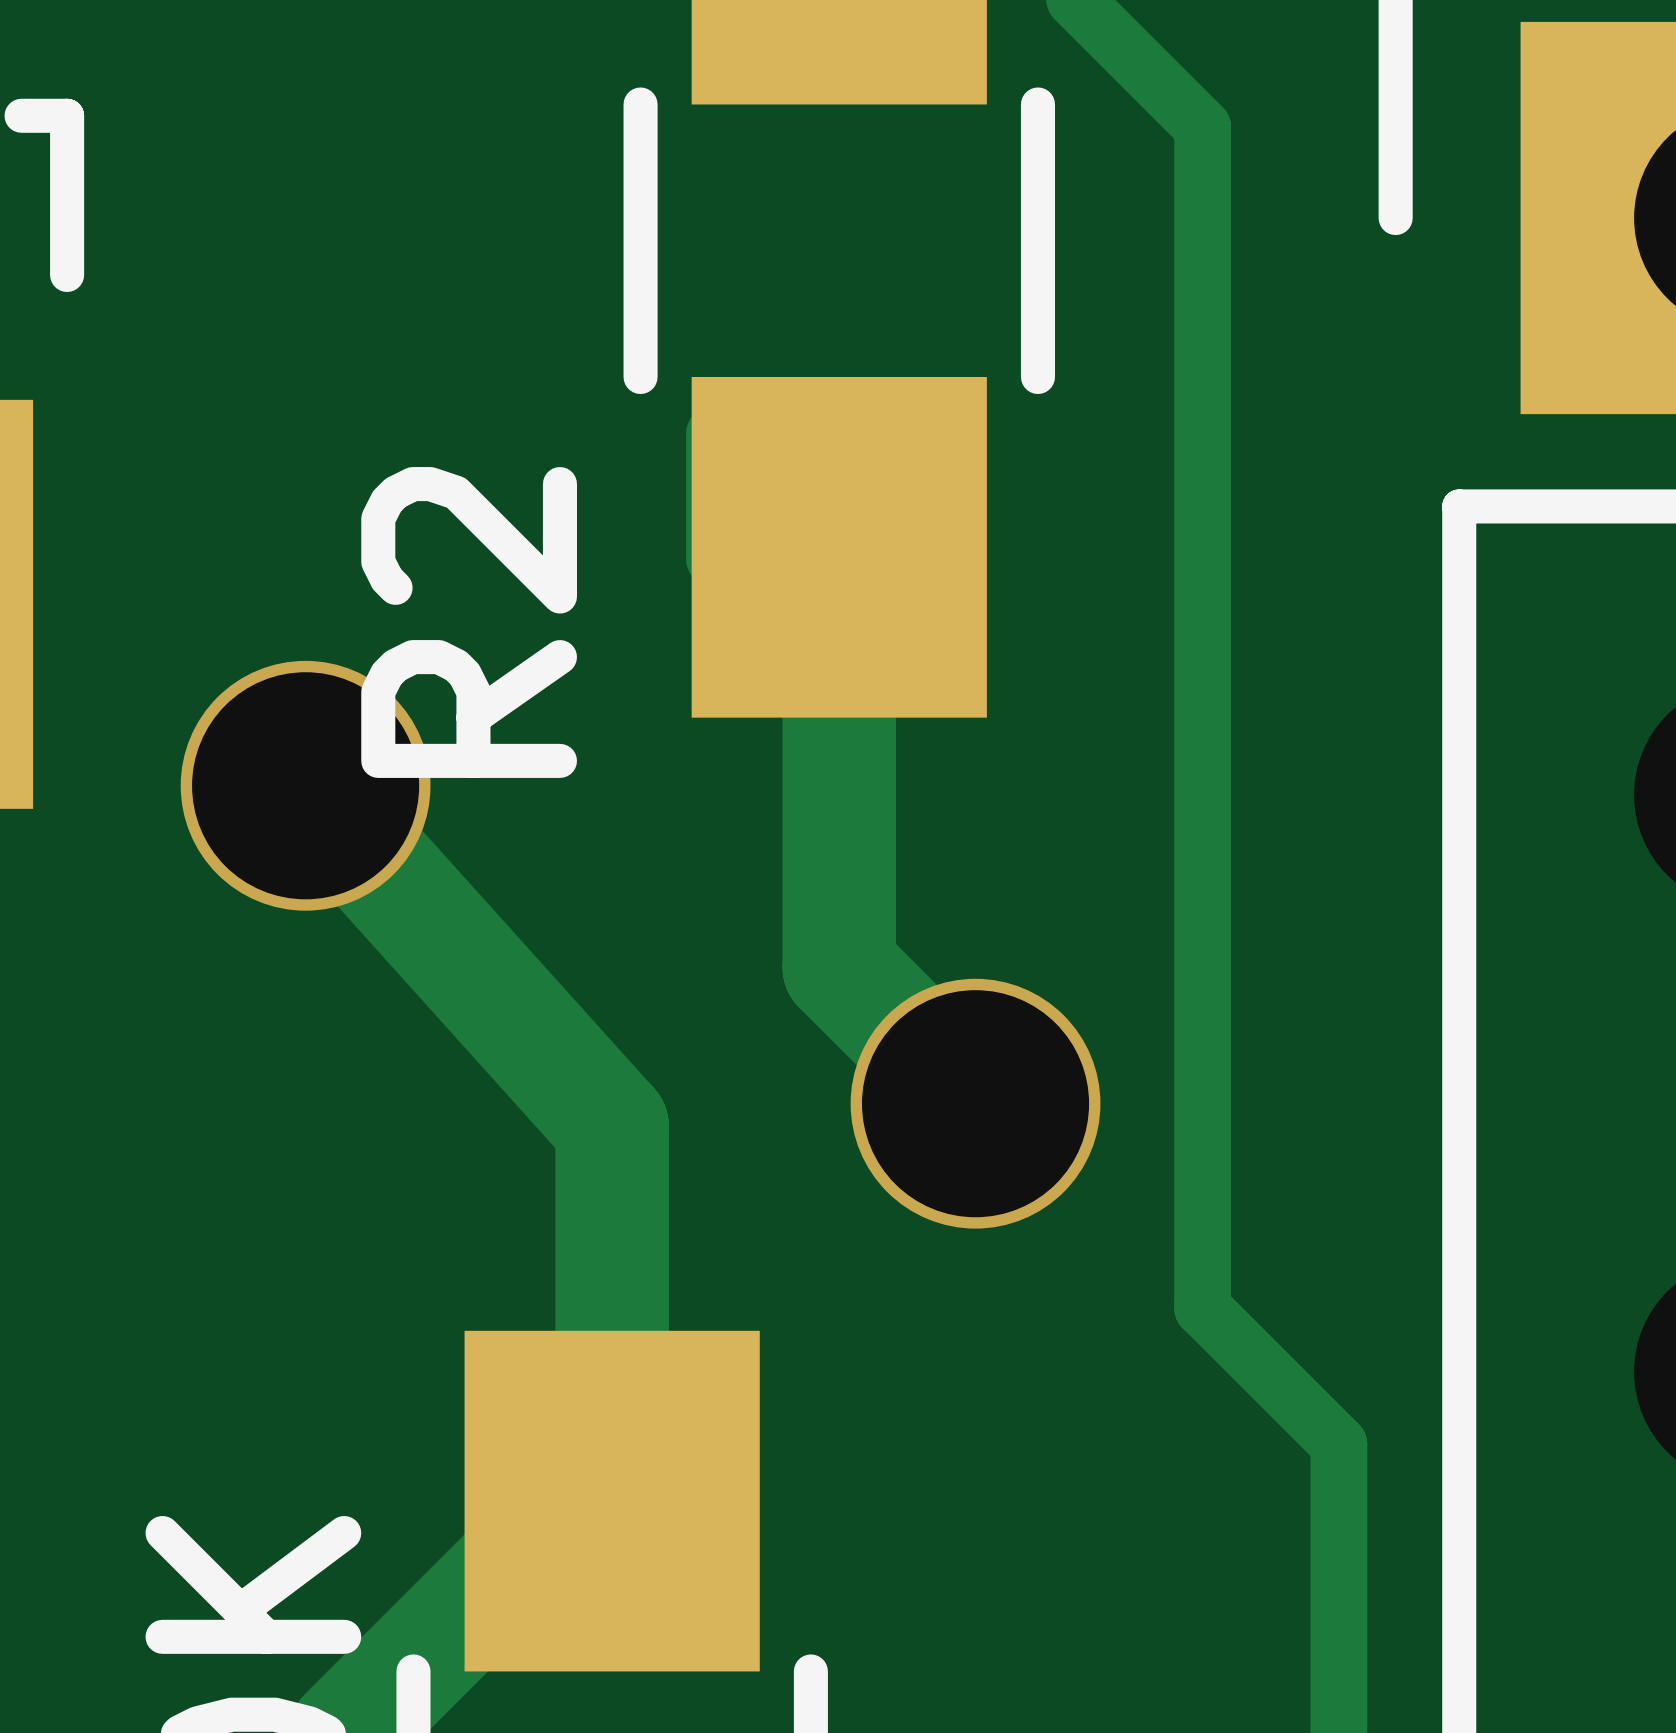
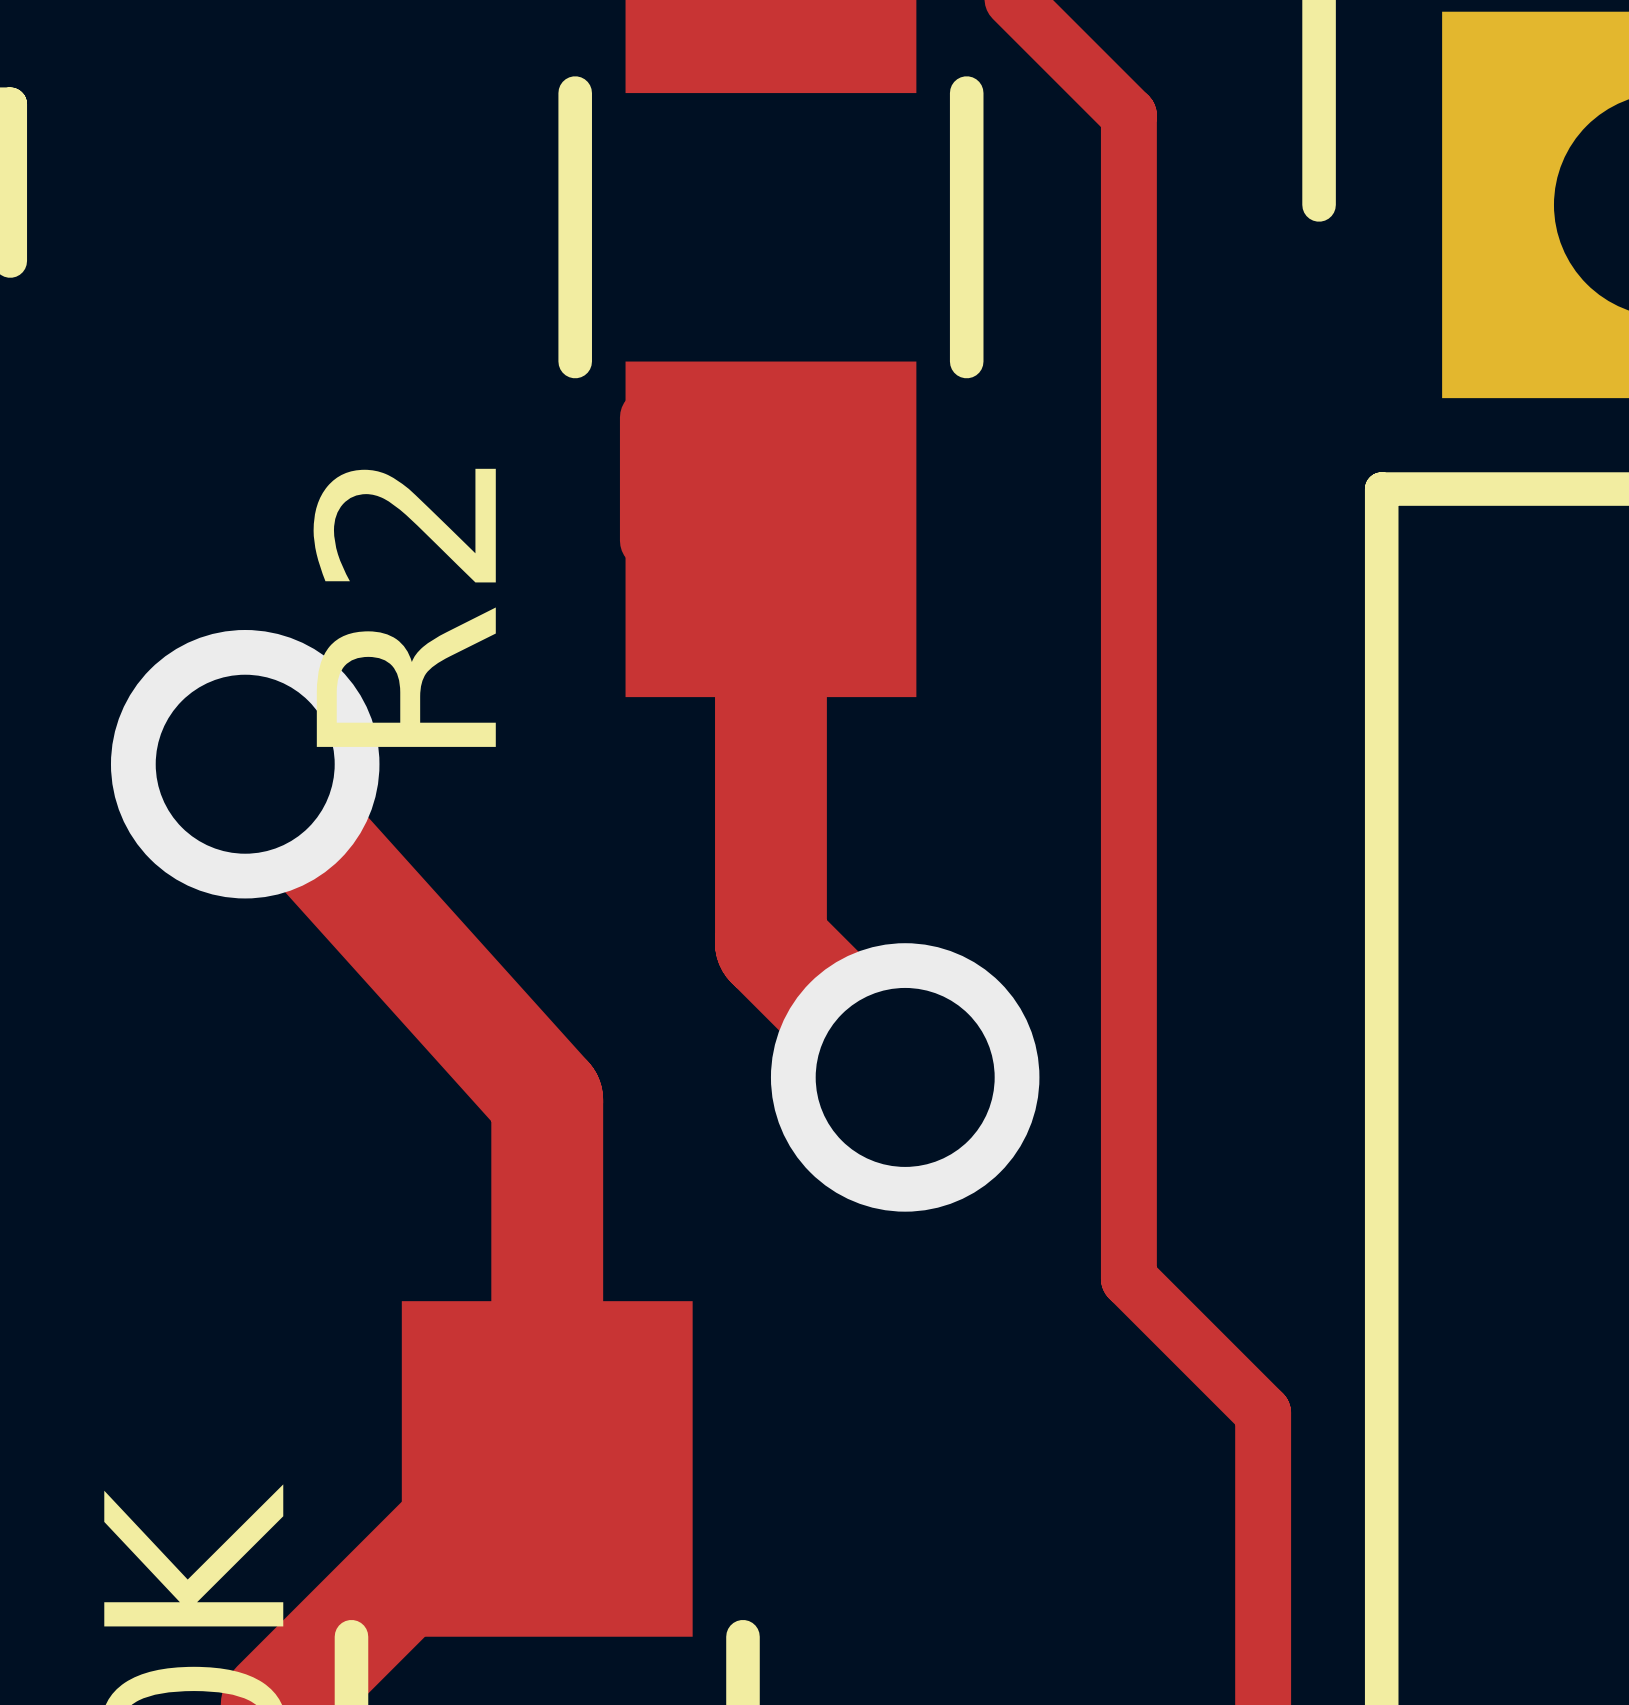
via size: [180, 660, 431, 911] -> [110, 629, 380, 899]
via size: [850, 978, 1101, 1229] -> [770, 943, 1040, 1212]

